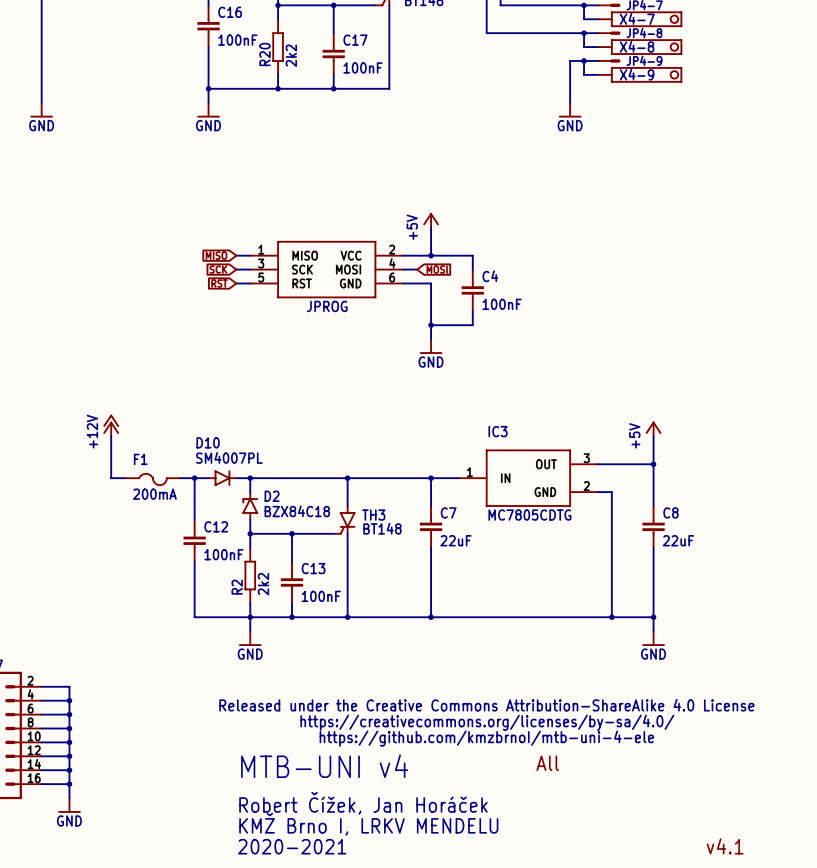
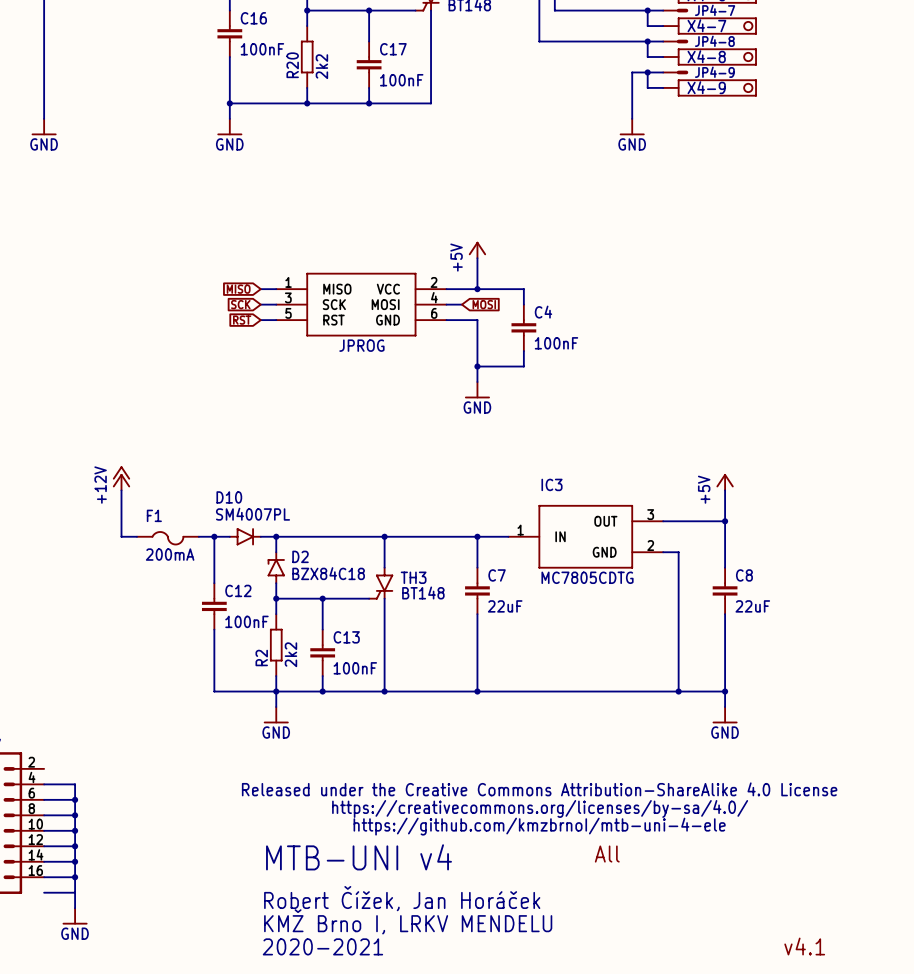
wire: (41, 686) (69, 686) (69, 700) -> (44, 892) (75, 892) (75, 908)
junction: (69, 700) -> none
power symbol position: GND (69, 805) -> GND (75, 916)

